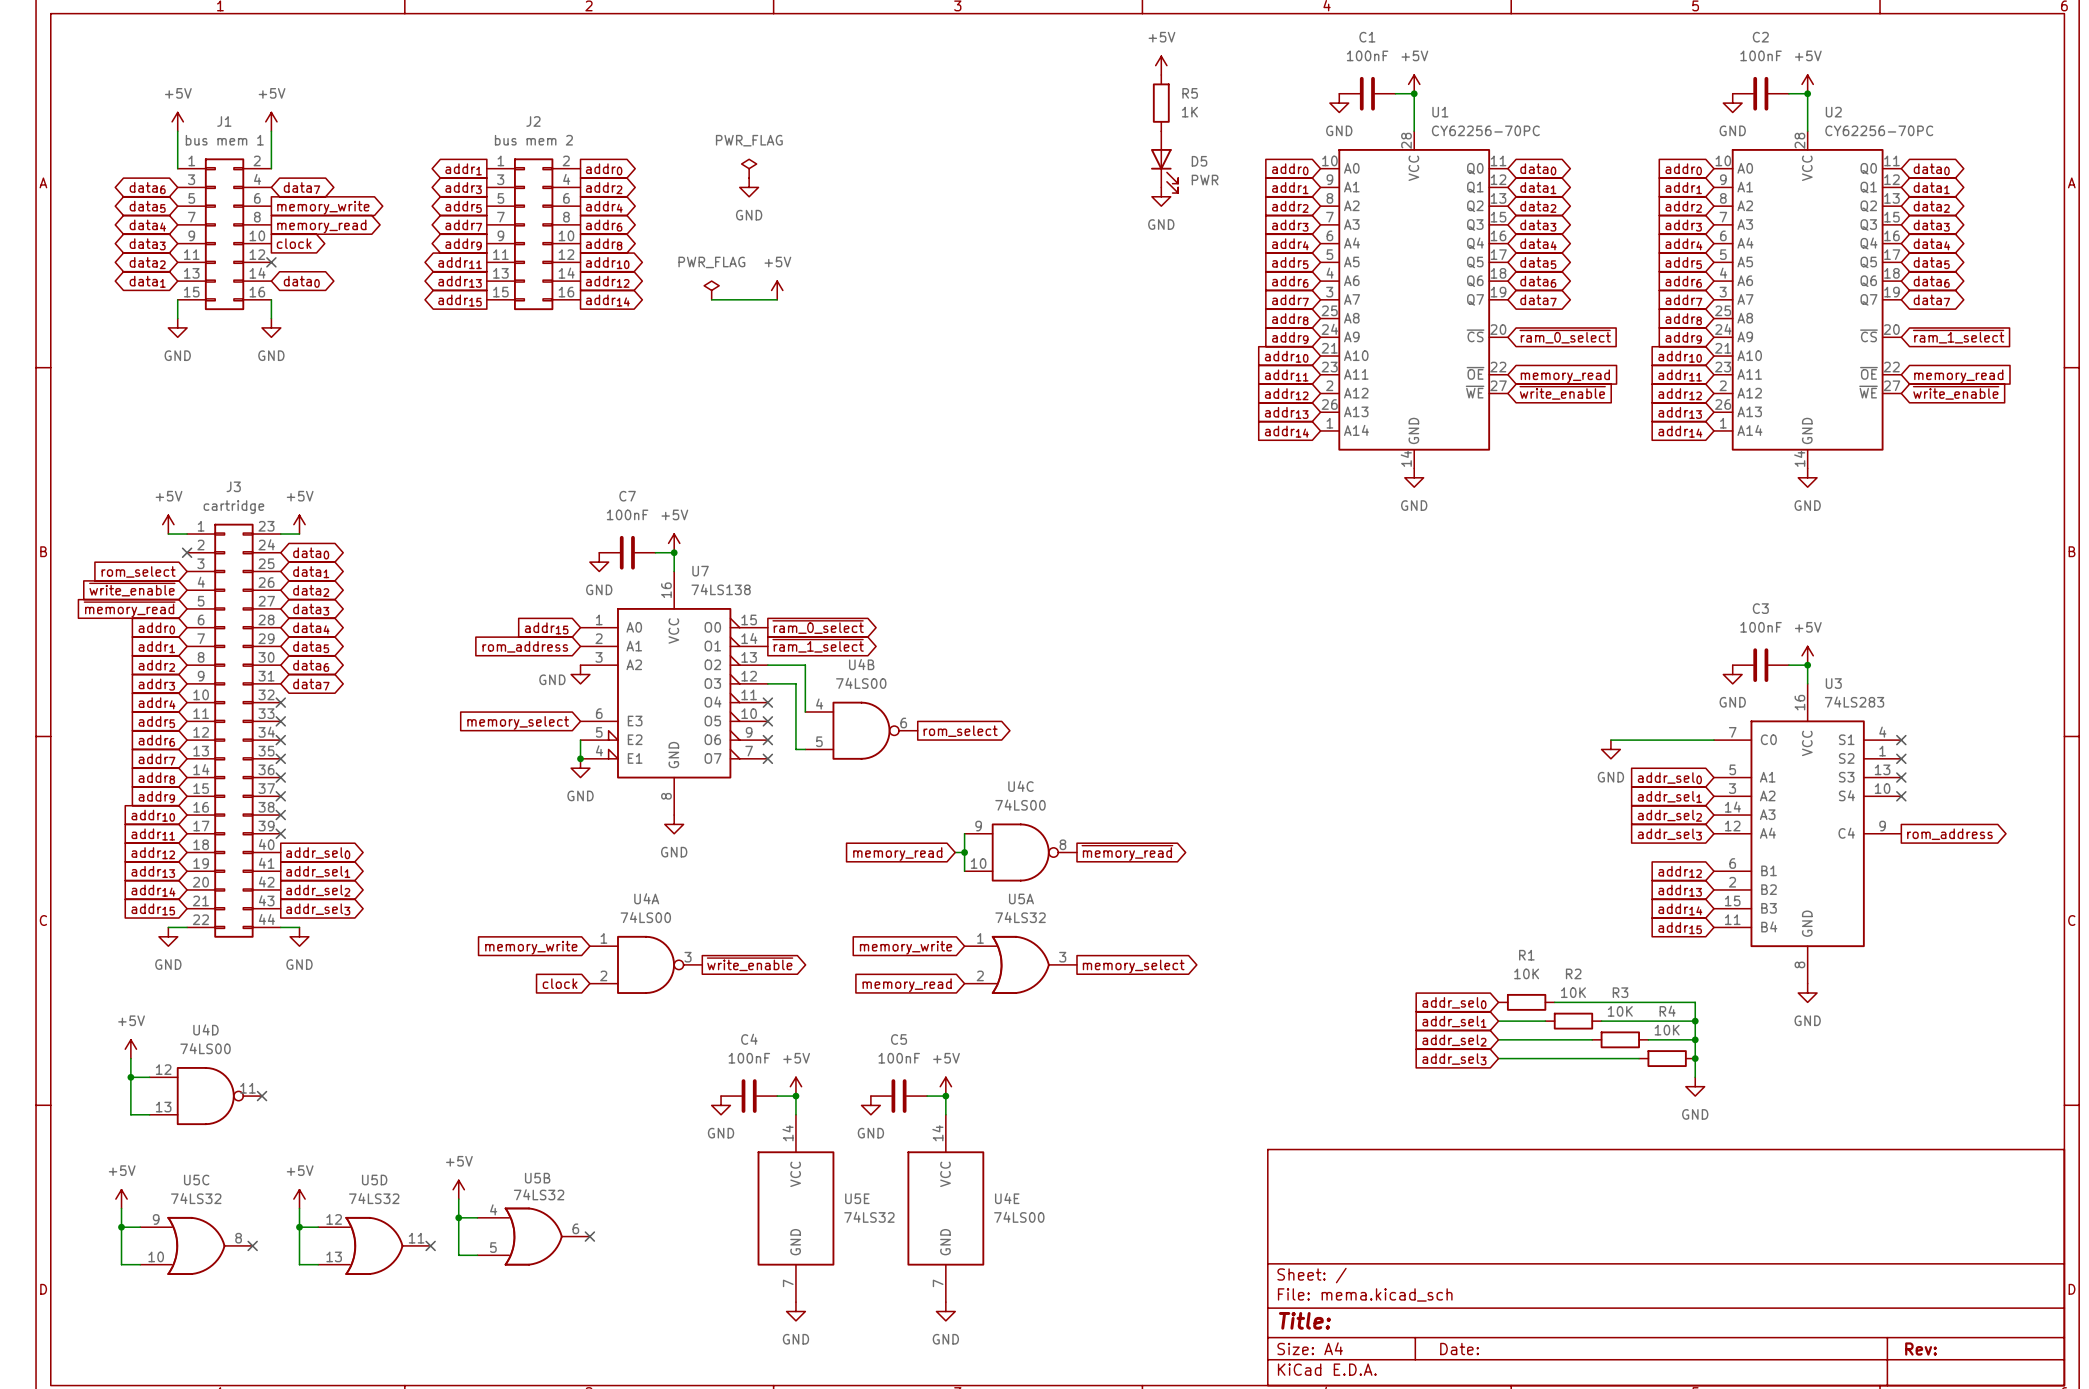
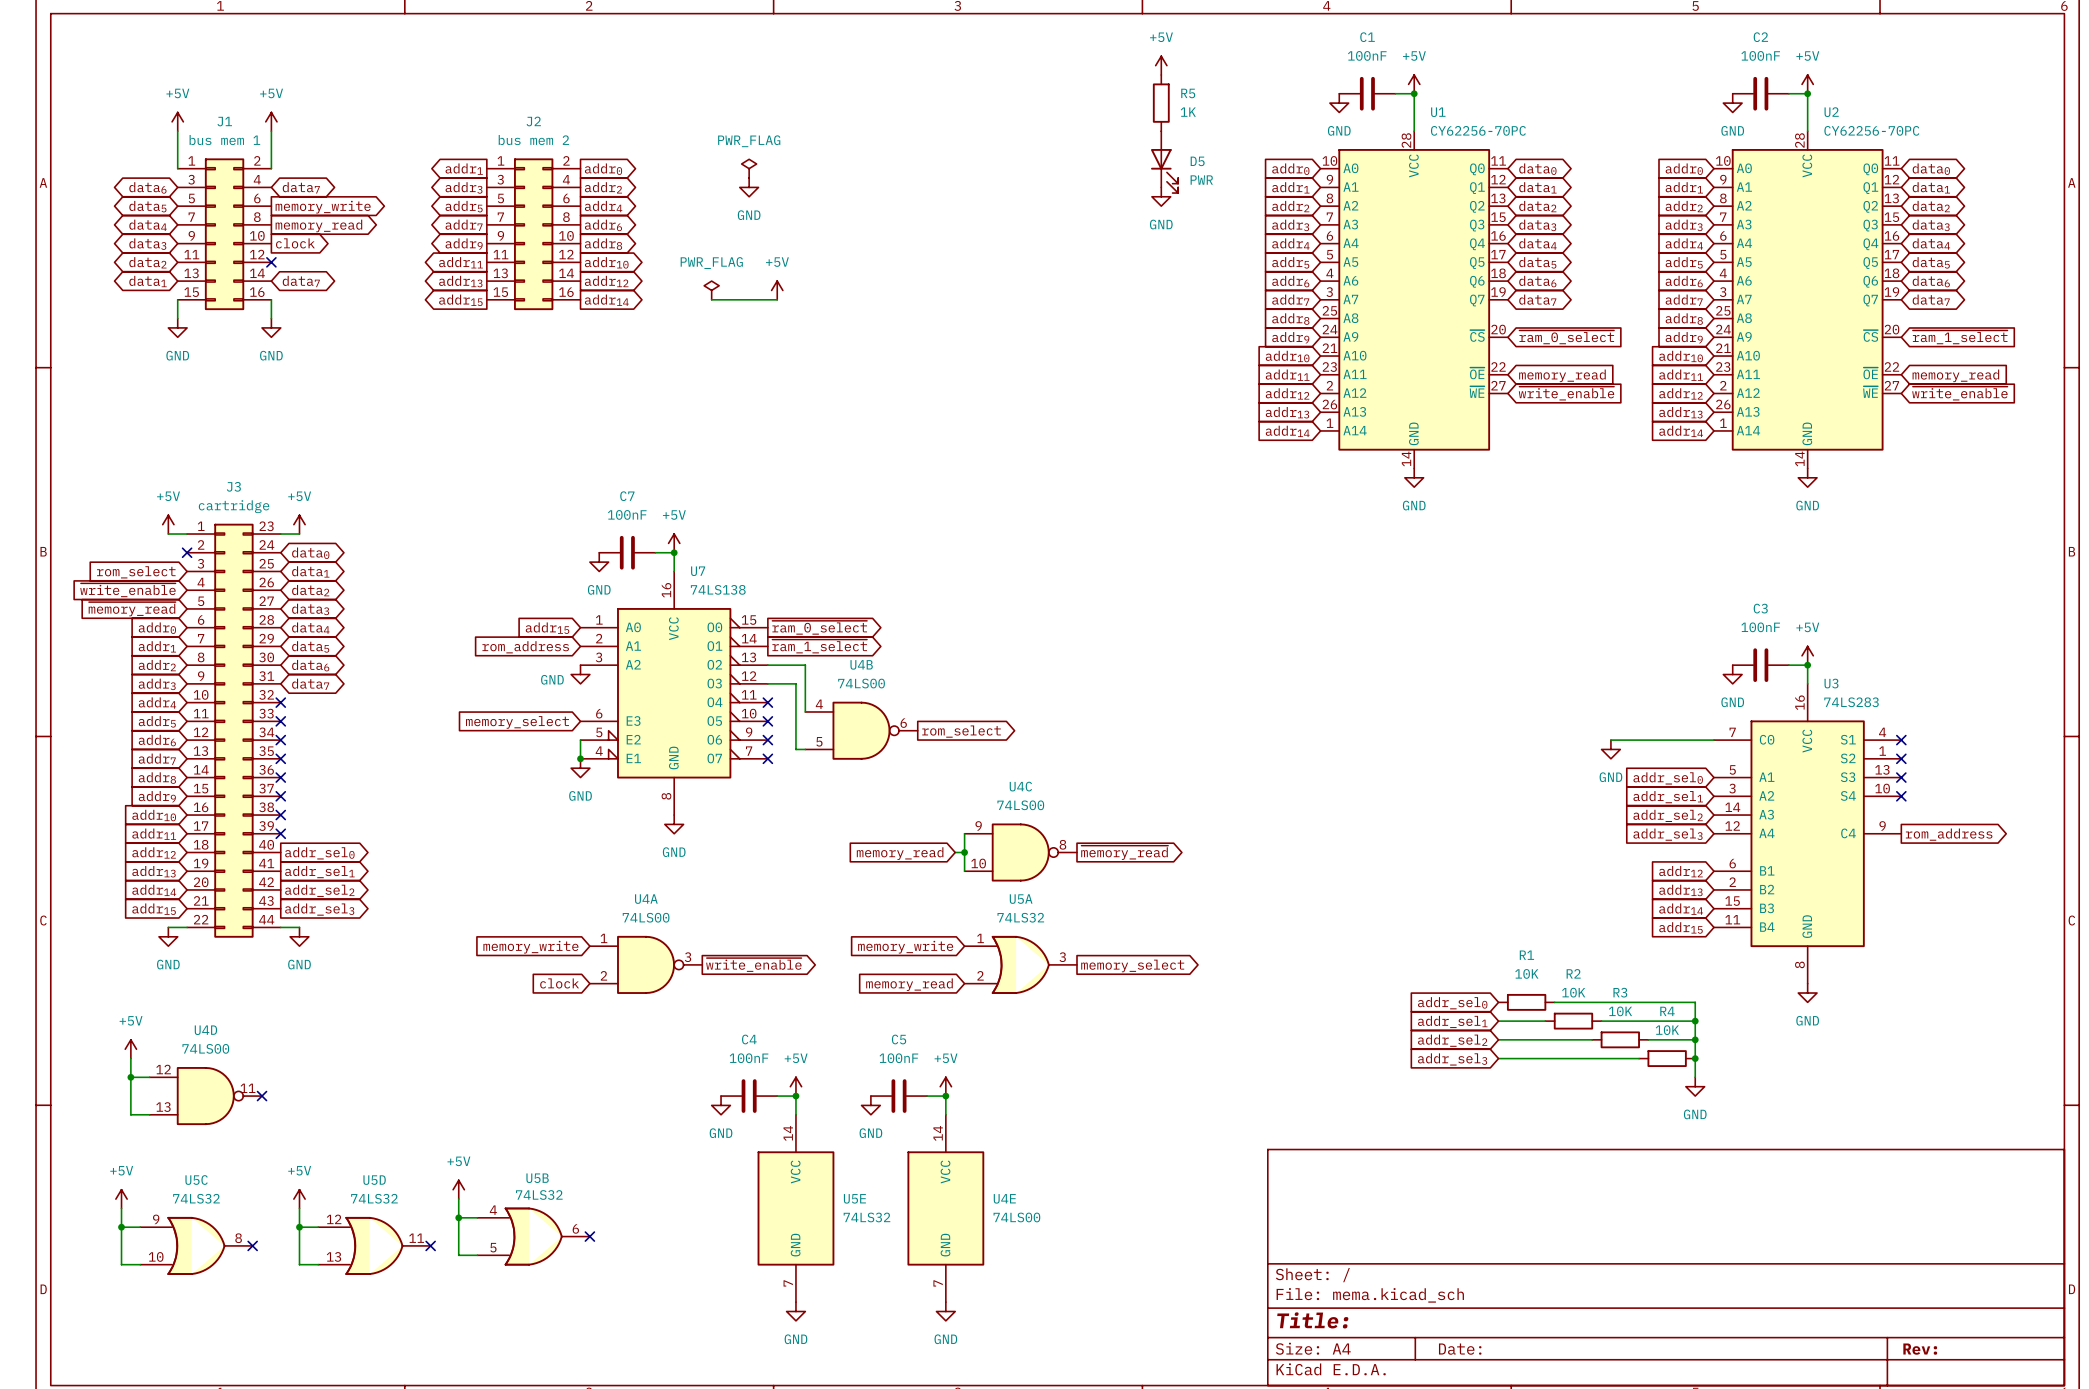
global label: data0 (301, 281) -> data7 (301, 281)

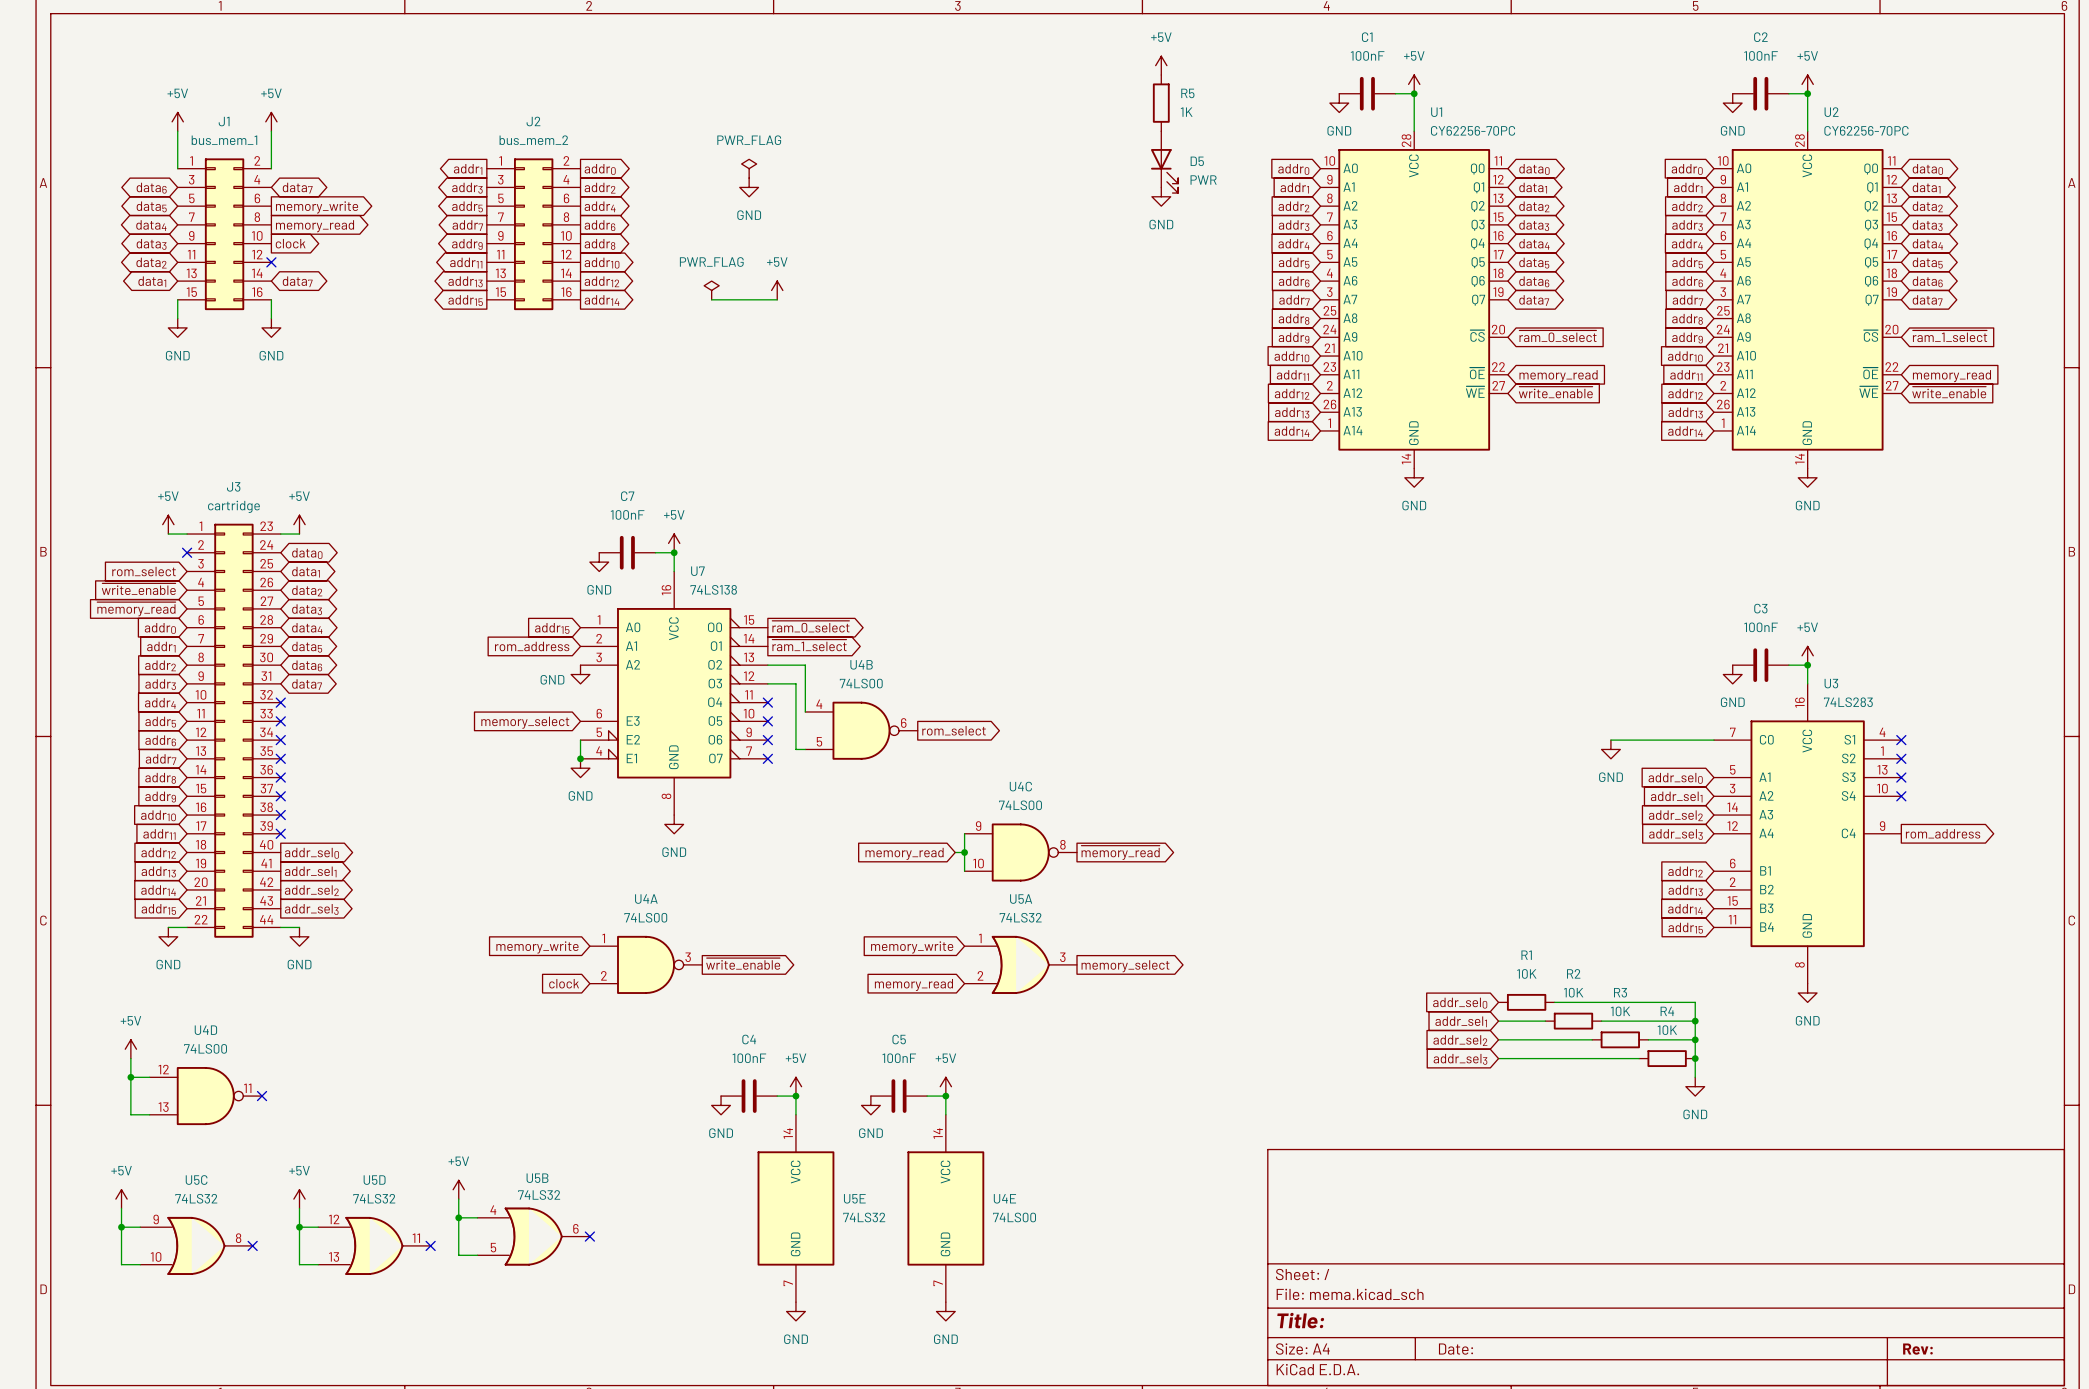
J1 value: bus mem 1 (224, 140) -> bus_mem_1 (224, 140)
J2 value: bus mem 2 (533, 140) -> bus_mem_2 (533, 140)

